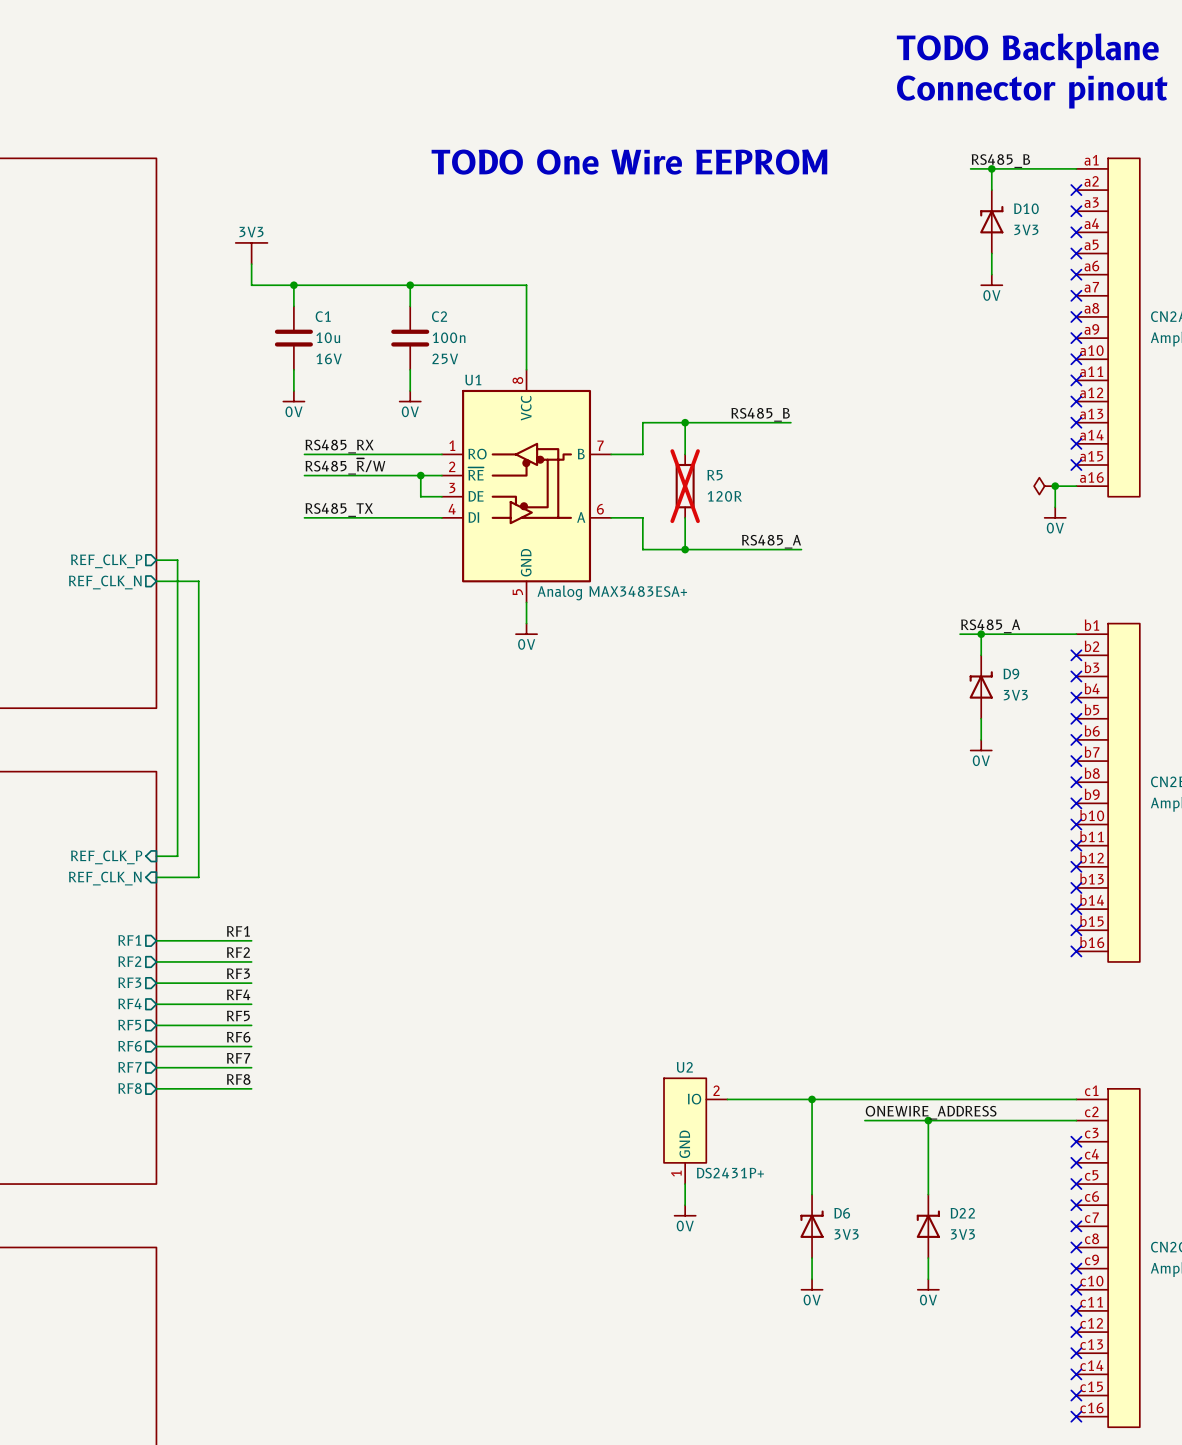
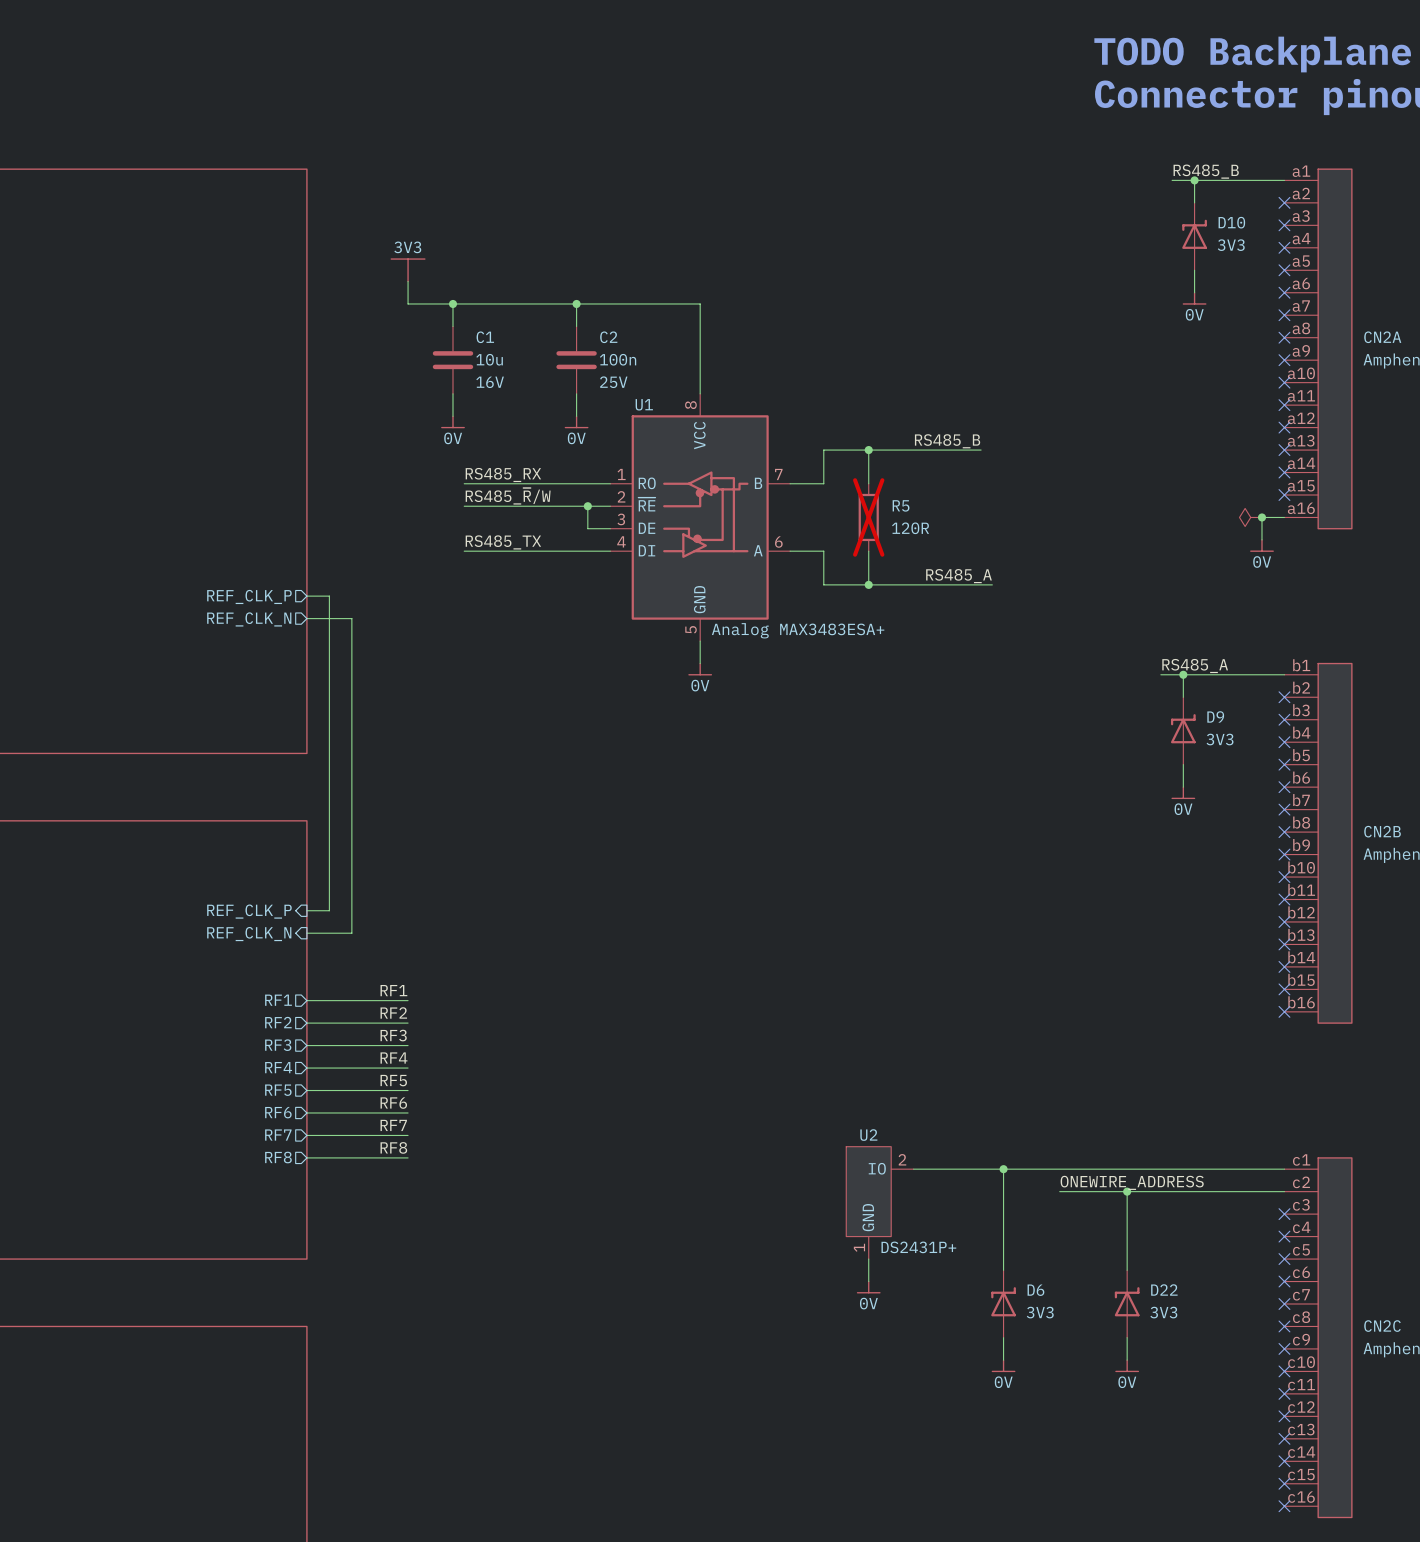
text: TODO One Wire EEPROM (629, 162) -> none

